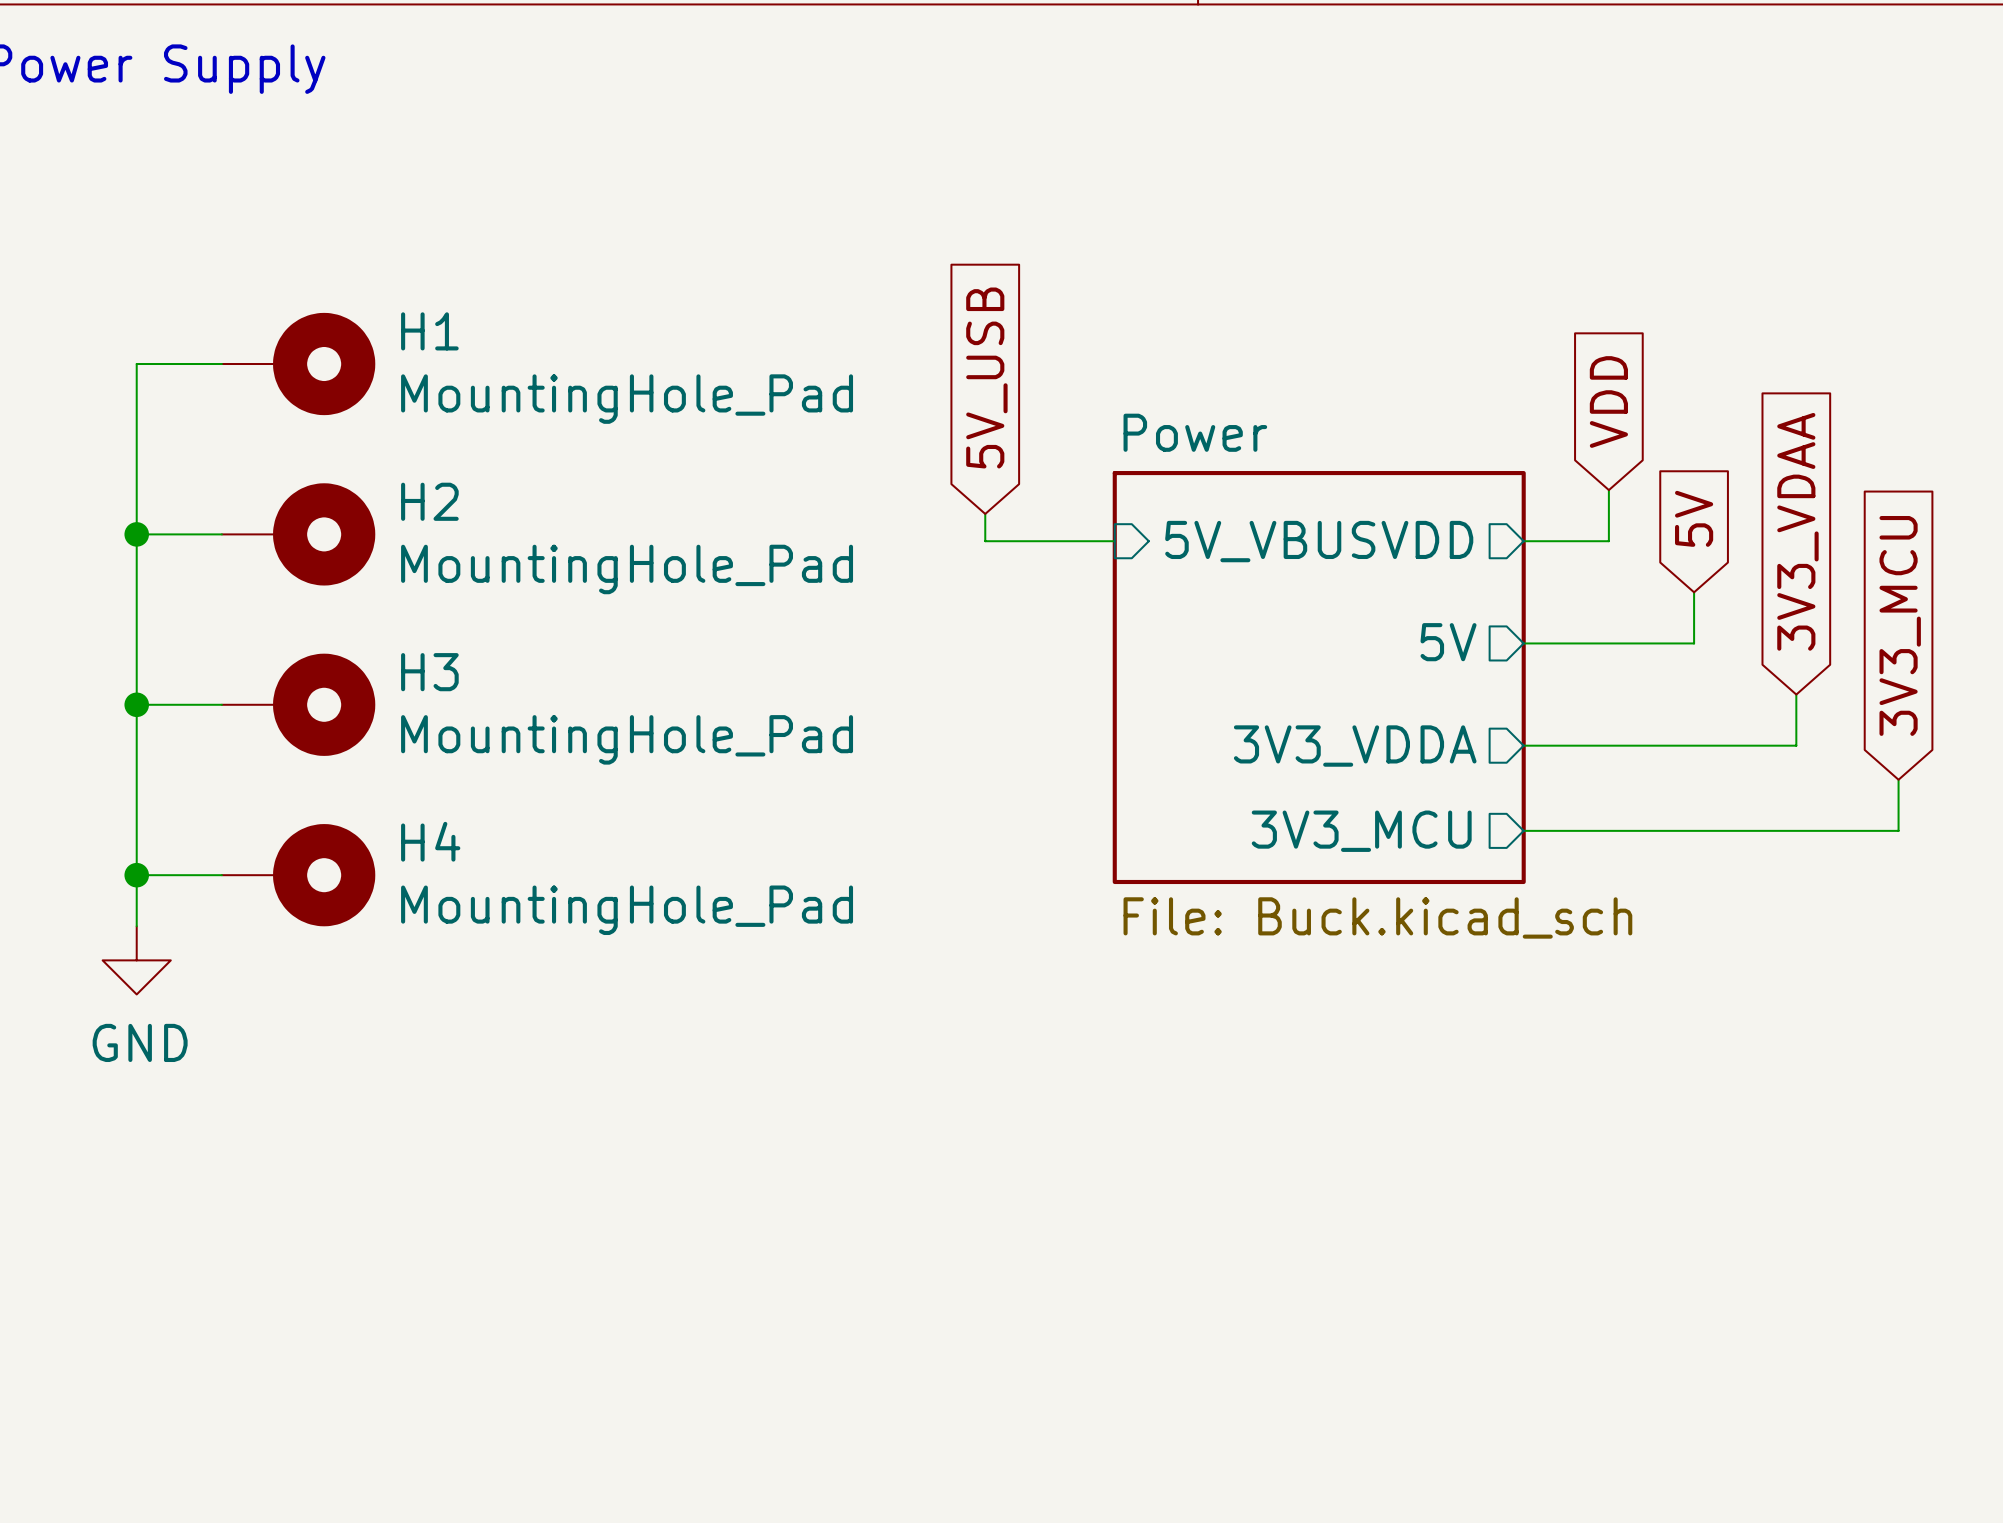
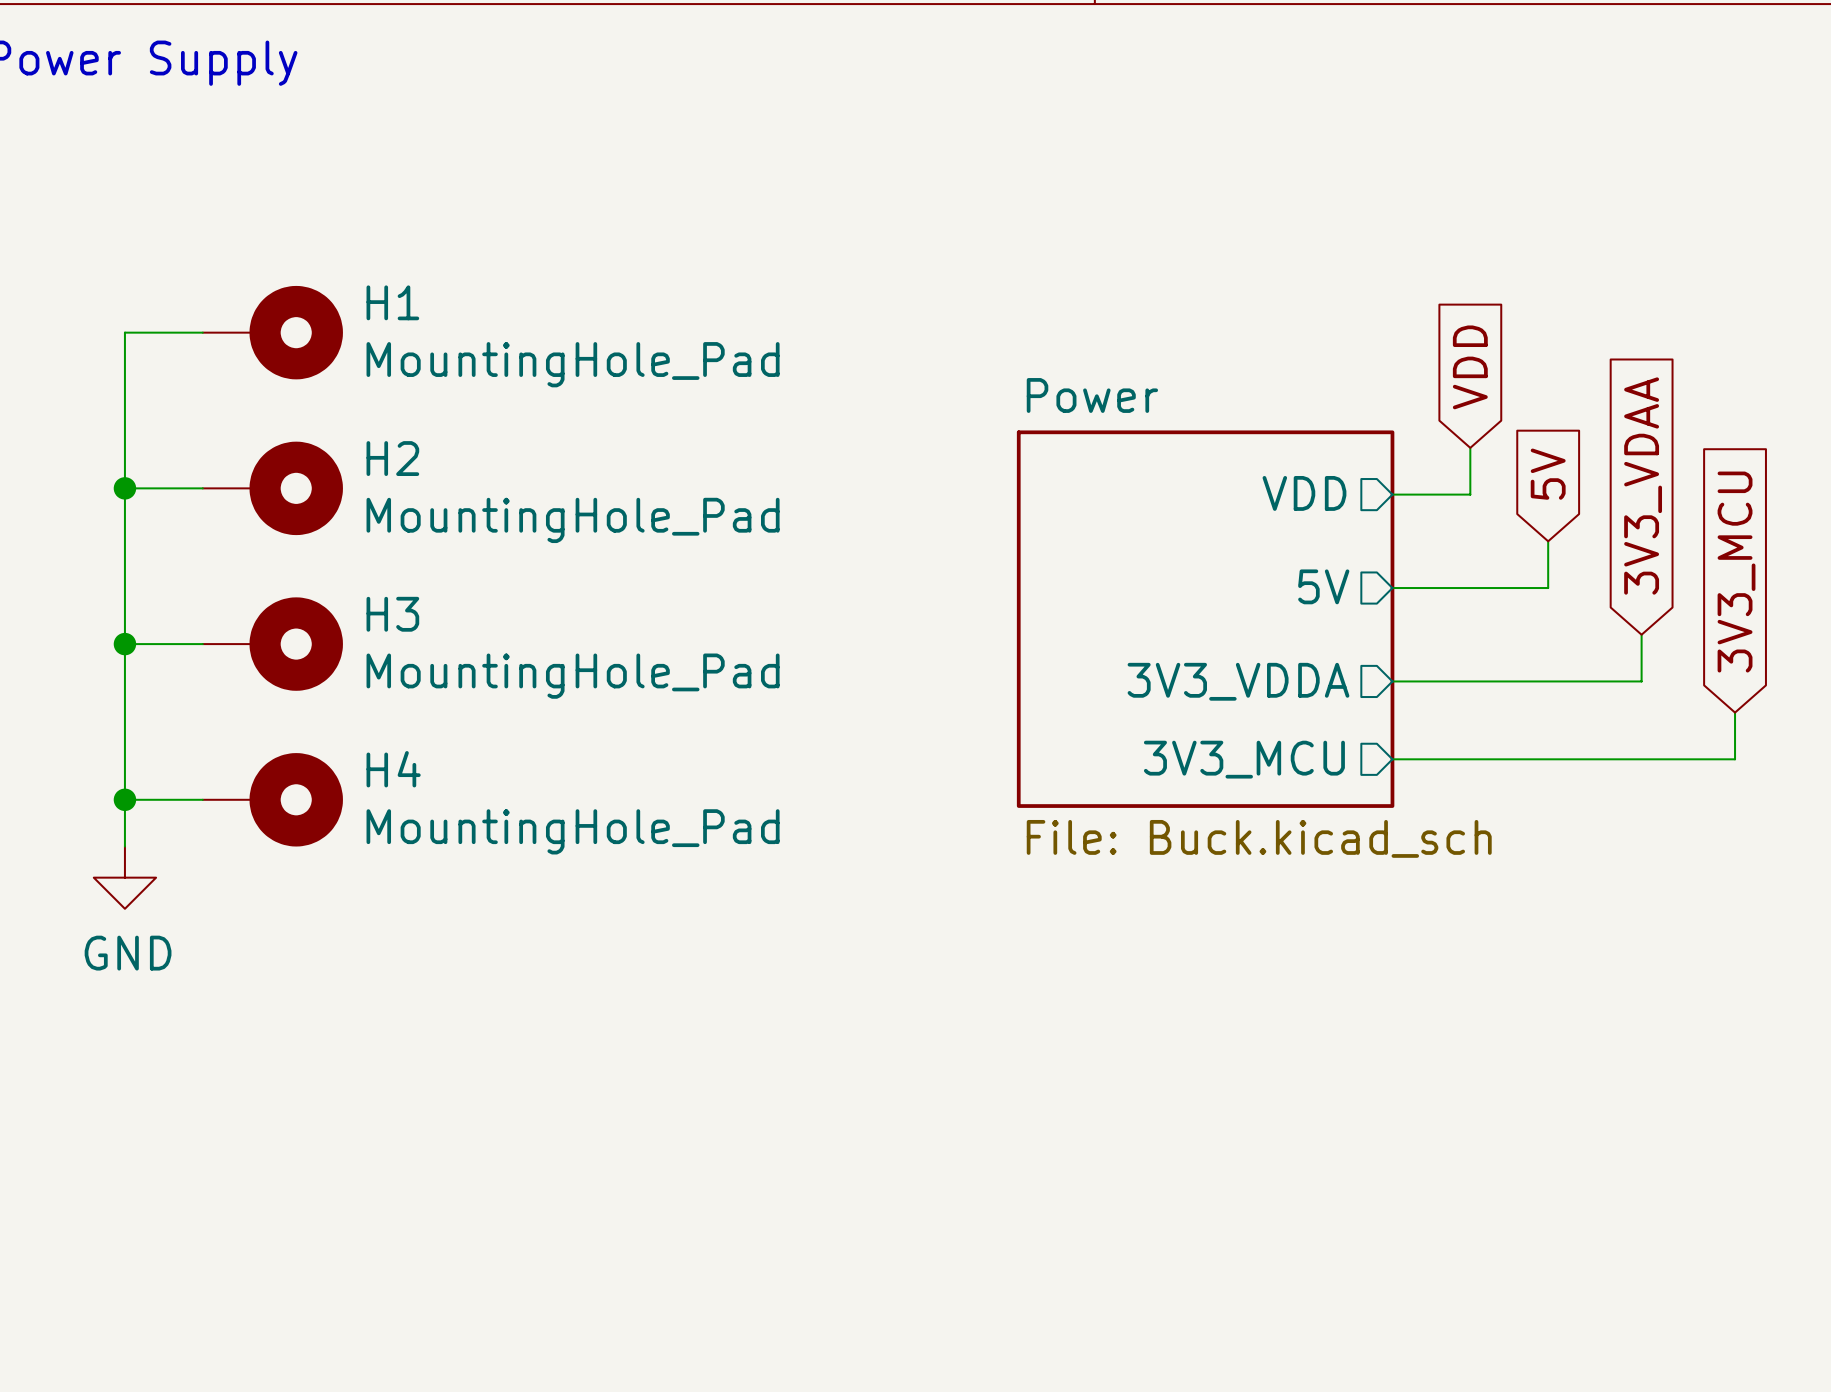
global label: 5V_USB (986, 377) -> none
wire: (985, 513) (985, 541) (1114, 541) -> none
sheet pin: 5V_VBUS (1270, 541) -> none

